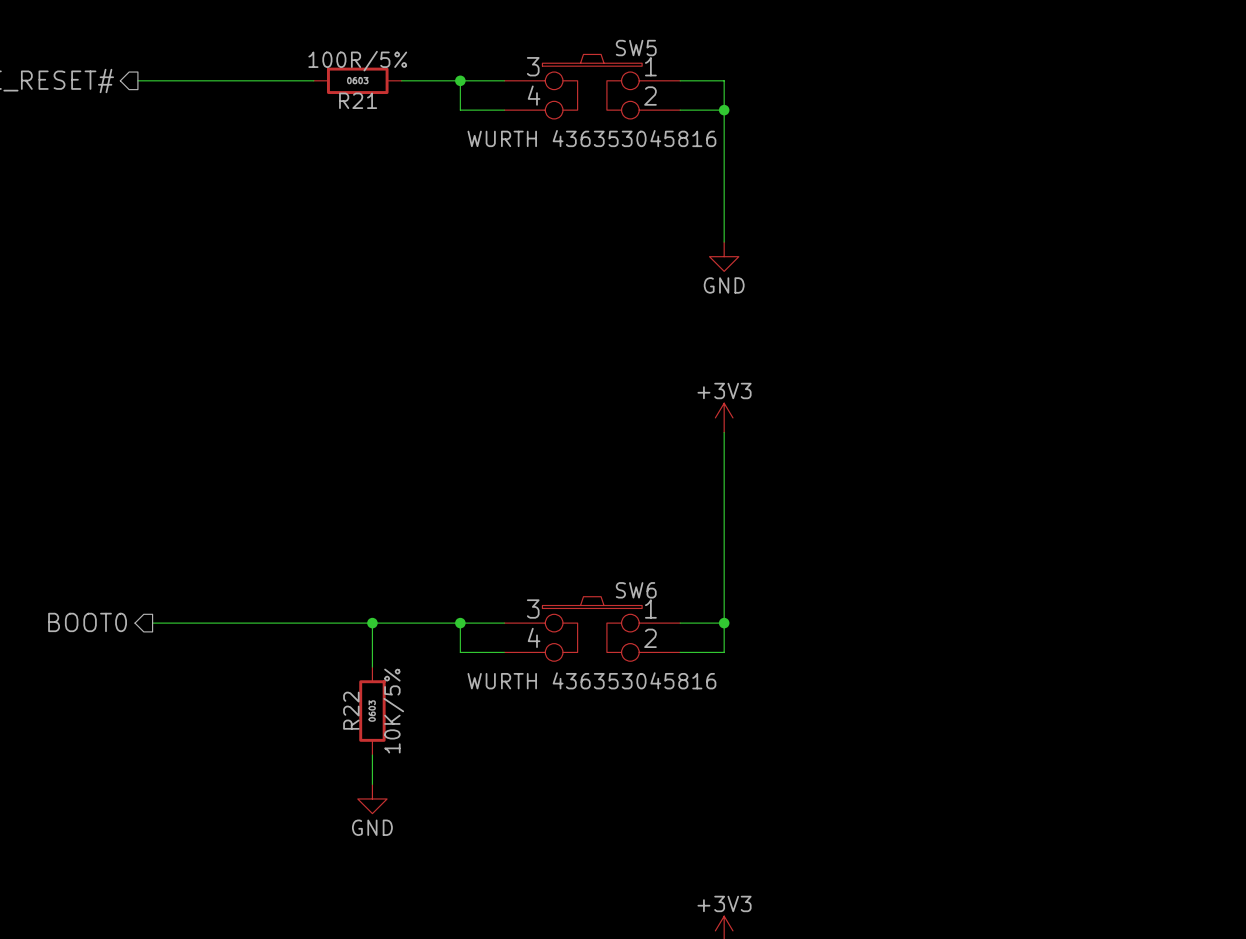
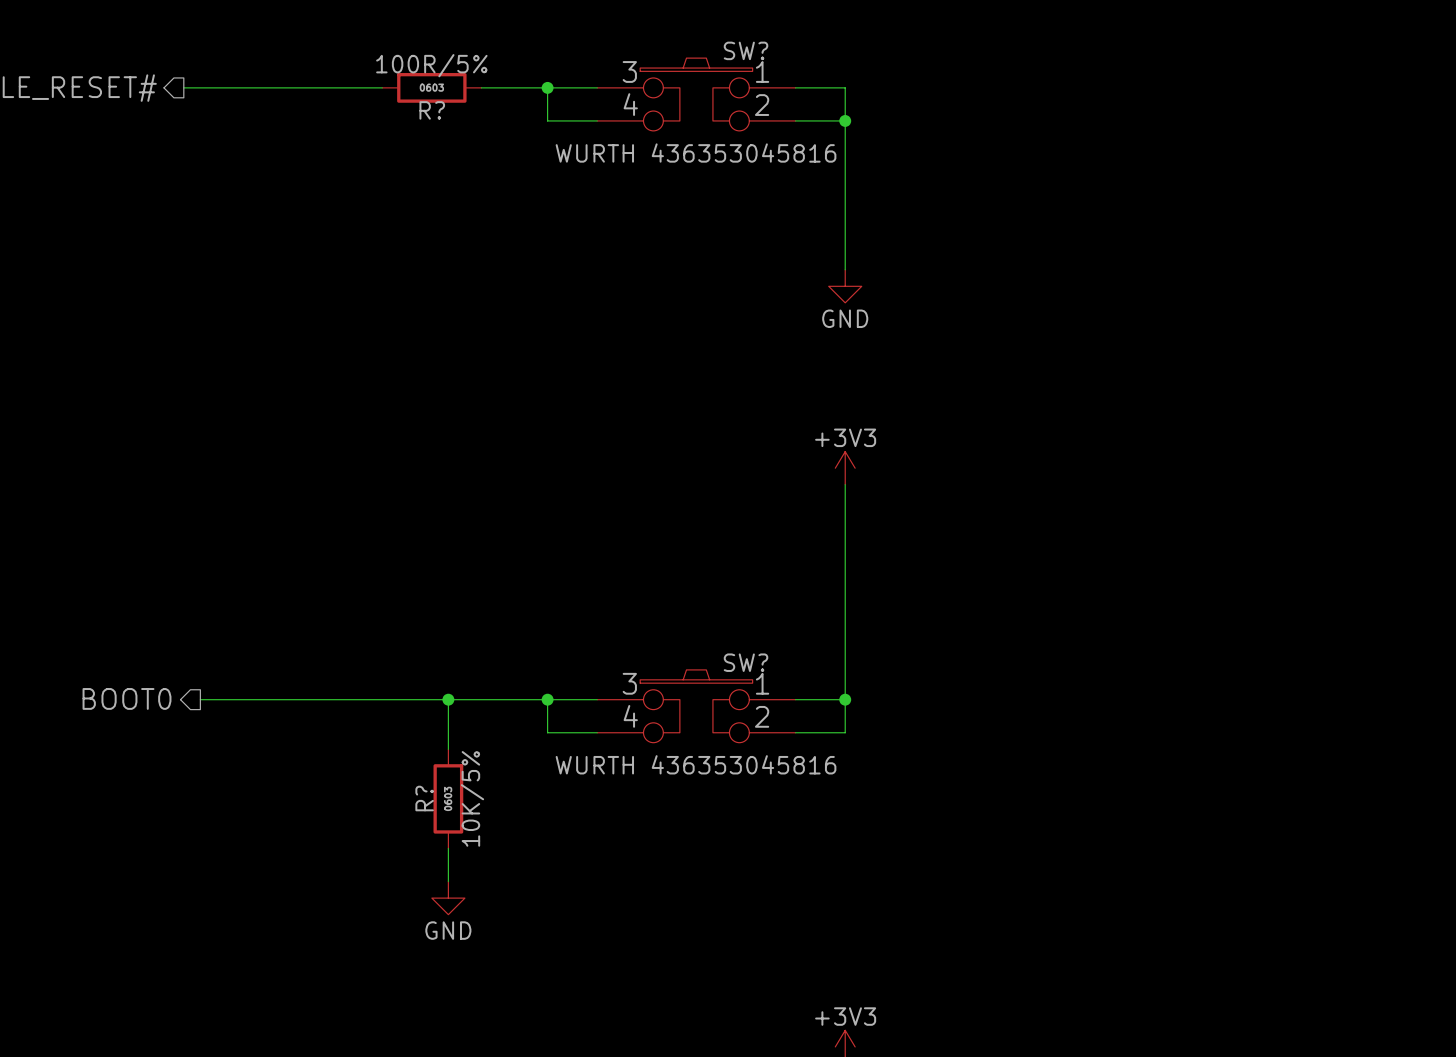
SW5 name: SW5 (636, 48) -> SW? (746, 50)
R21 name: R21 (358, 100) -> R? (432, 110)
SW6 name: SW6 (636, 590) -> SW? (746, 662)
R22 name: R22 (351, 710) -> R? (424, 798)

